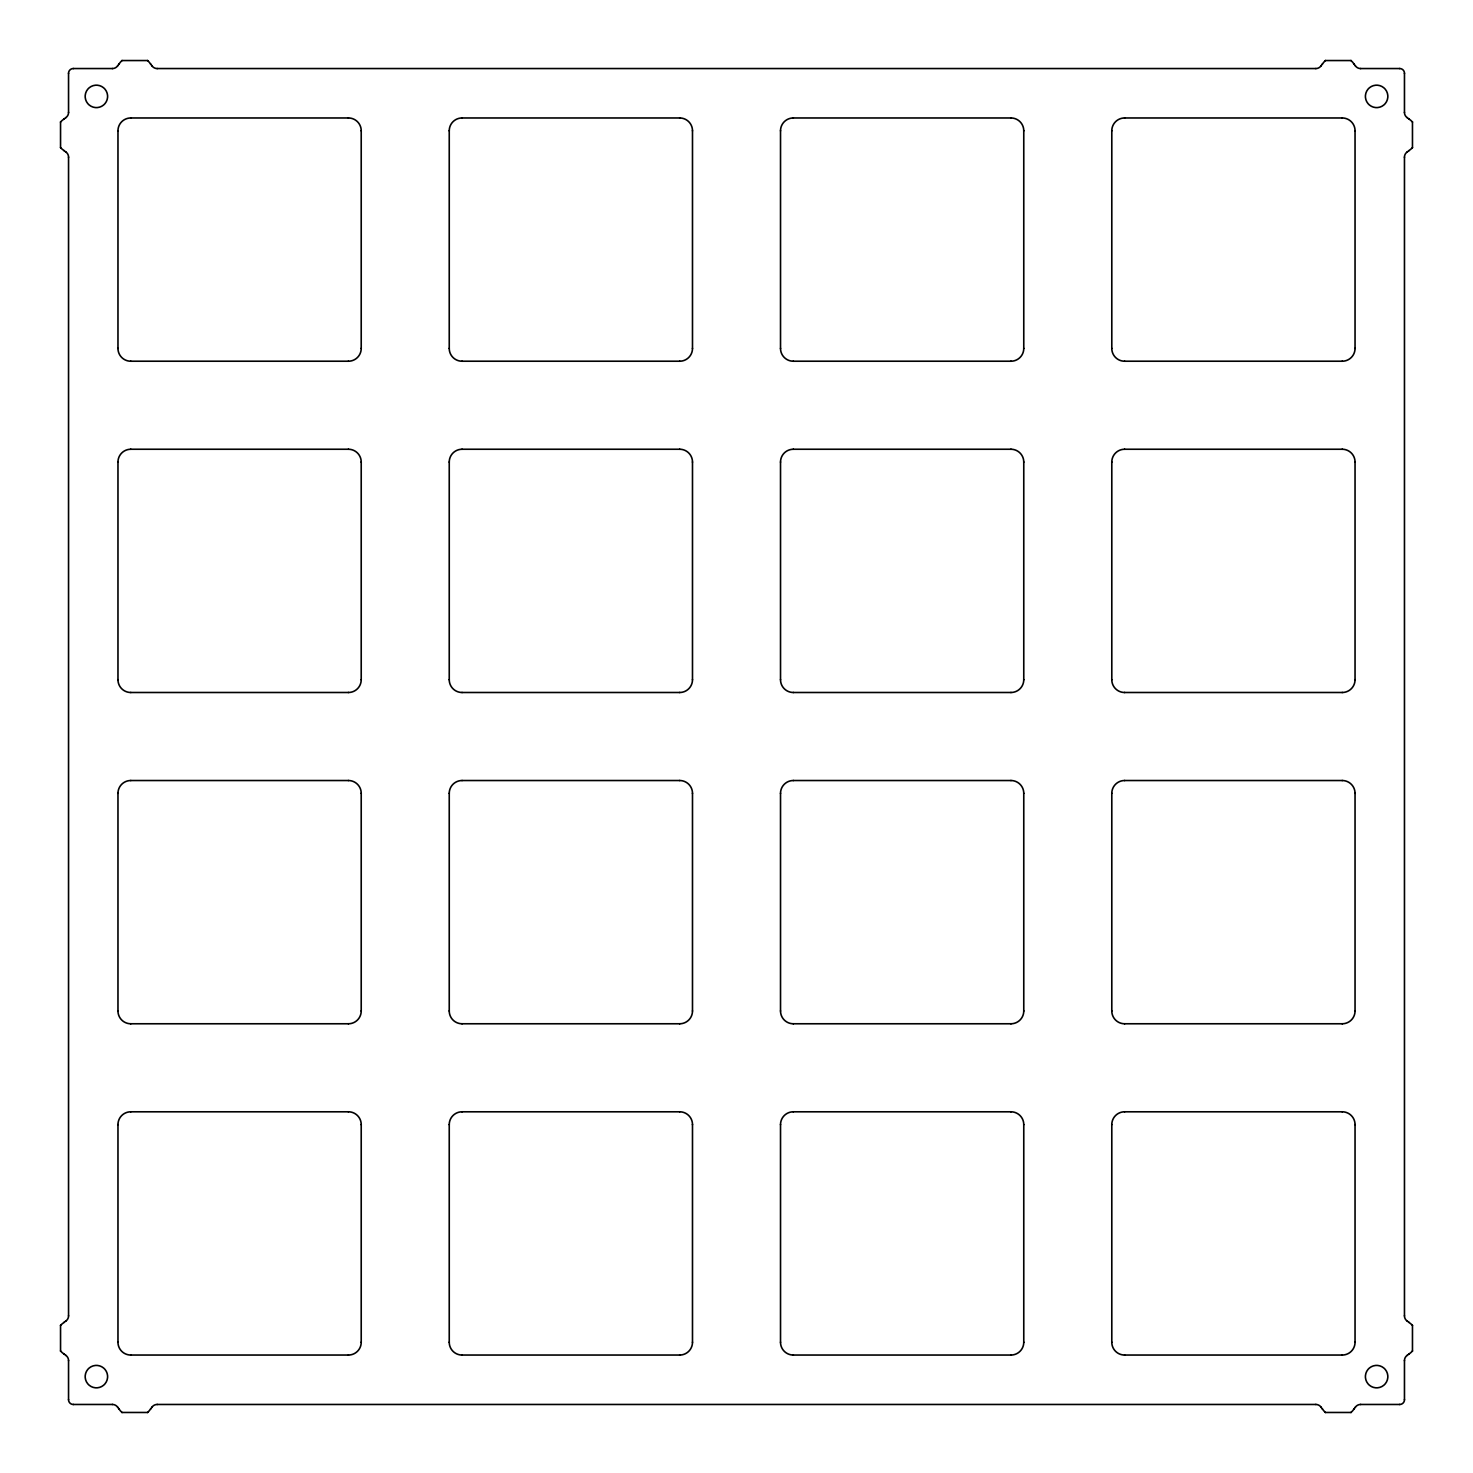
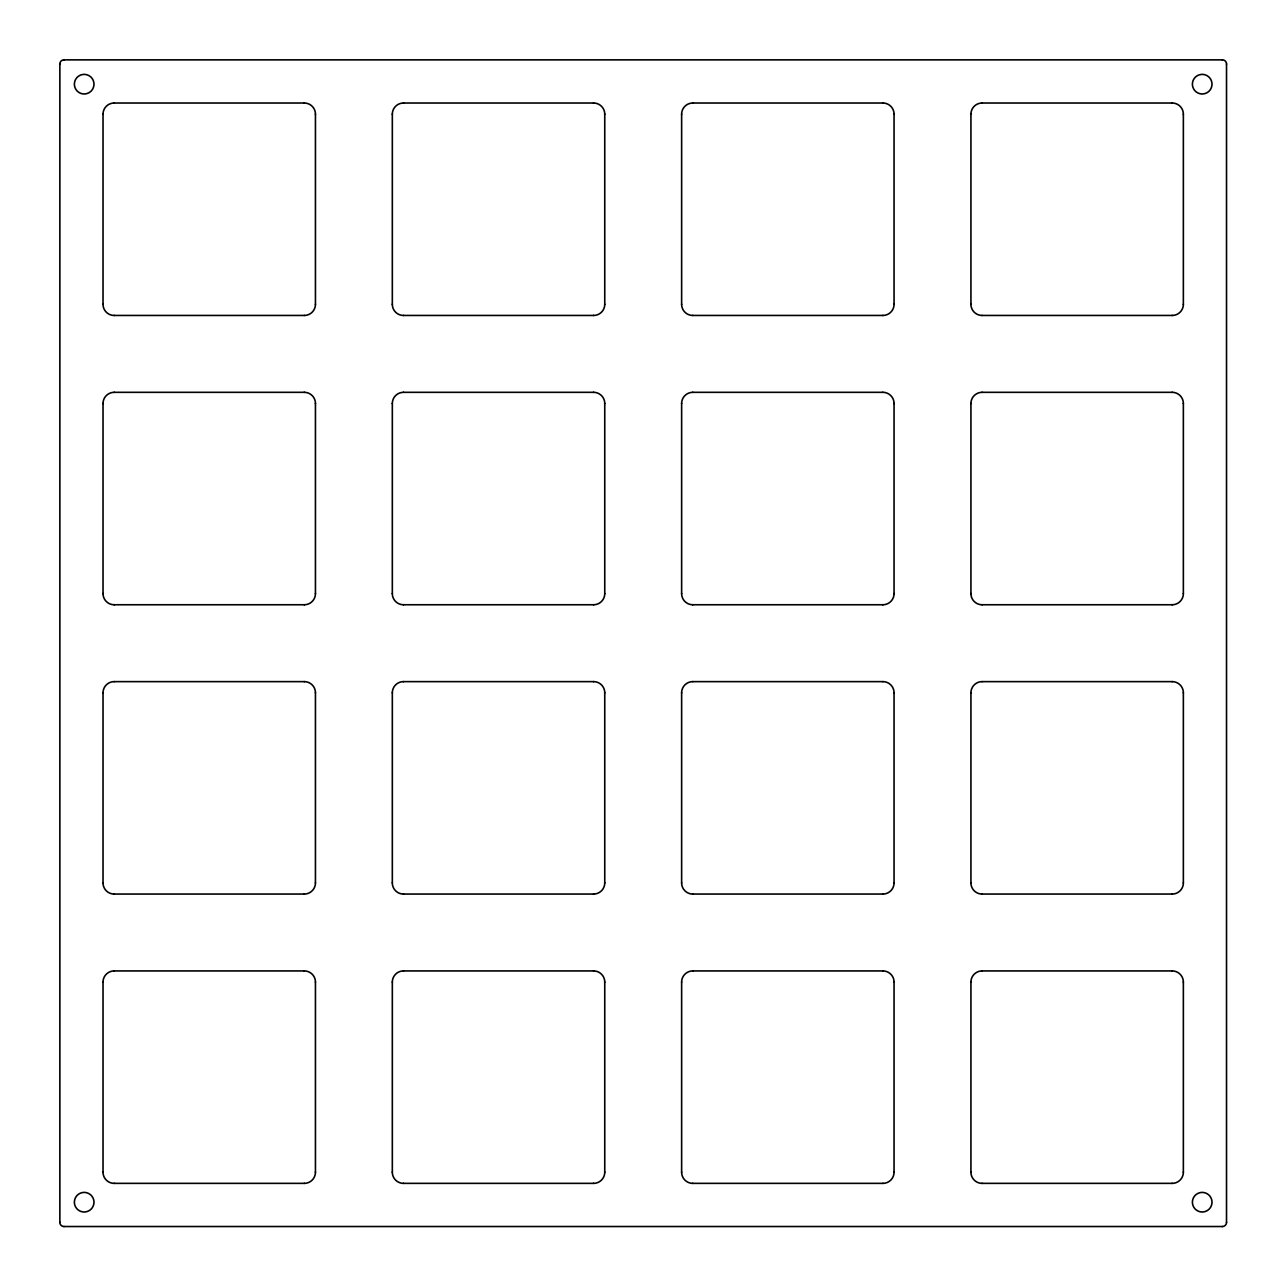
drawing shape: [60, 60, 1413, 1413] -> [59, 59, 1227, 1227]

